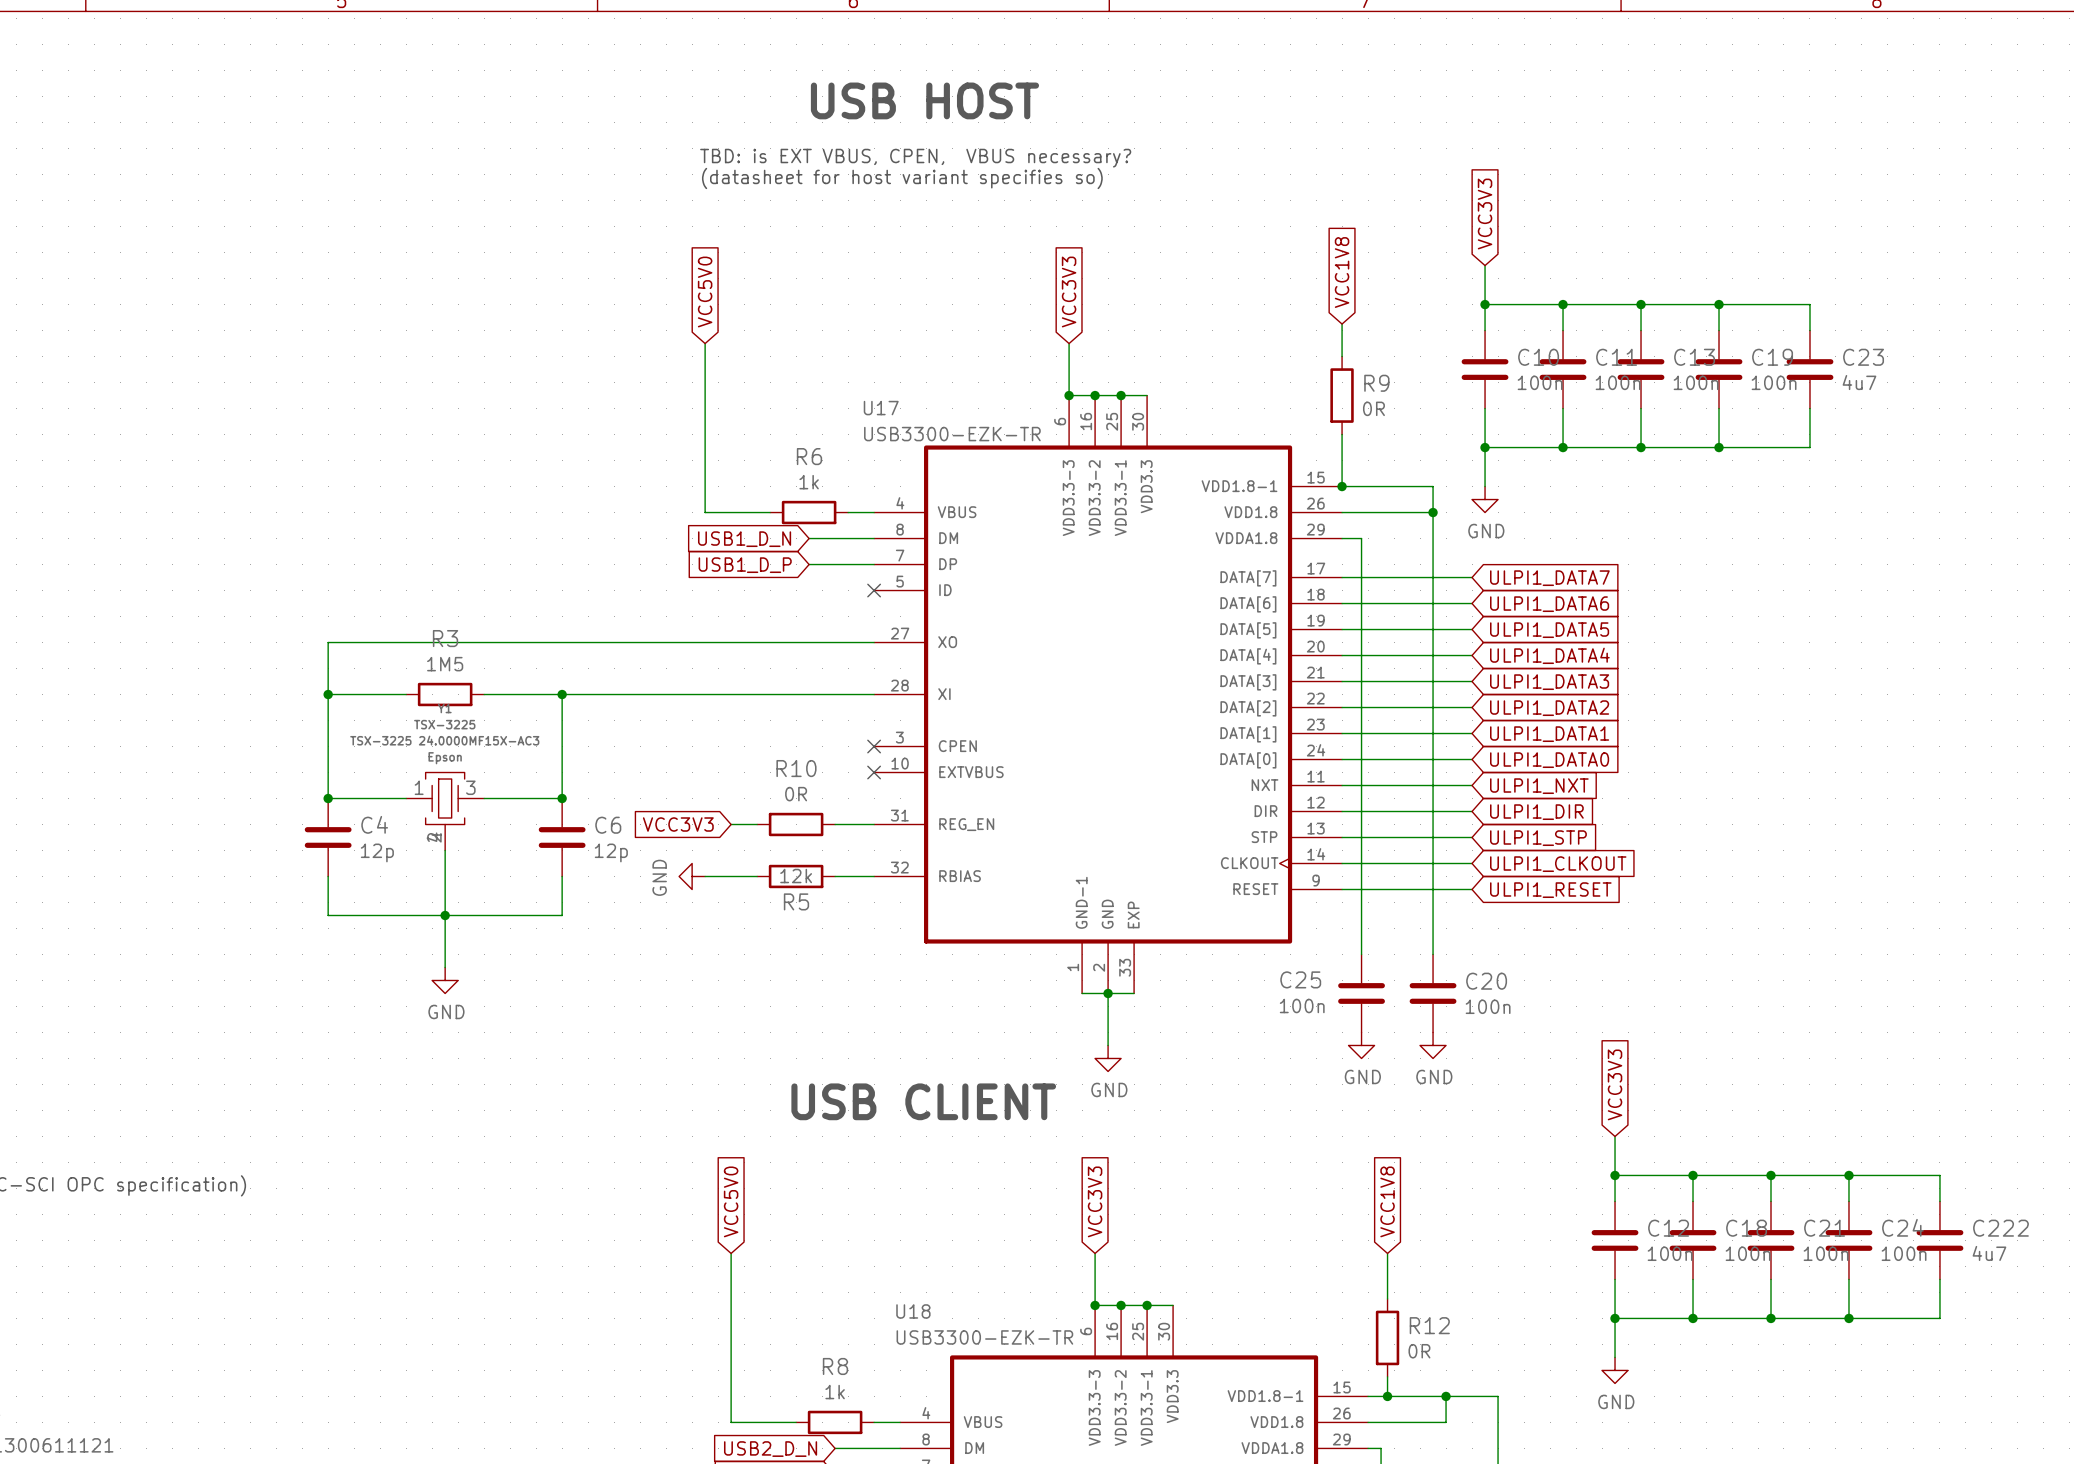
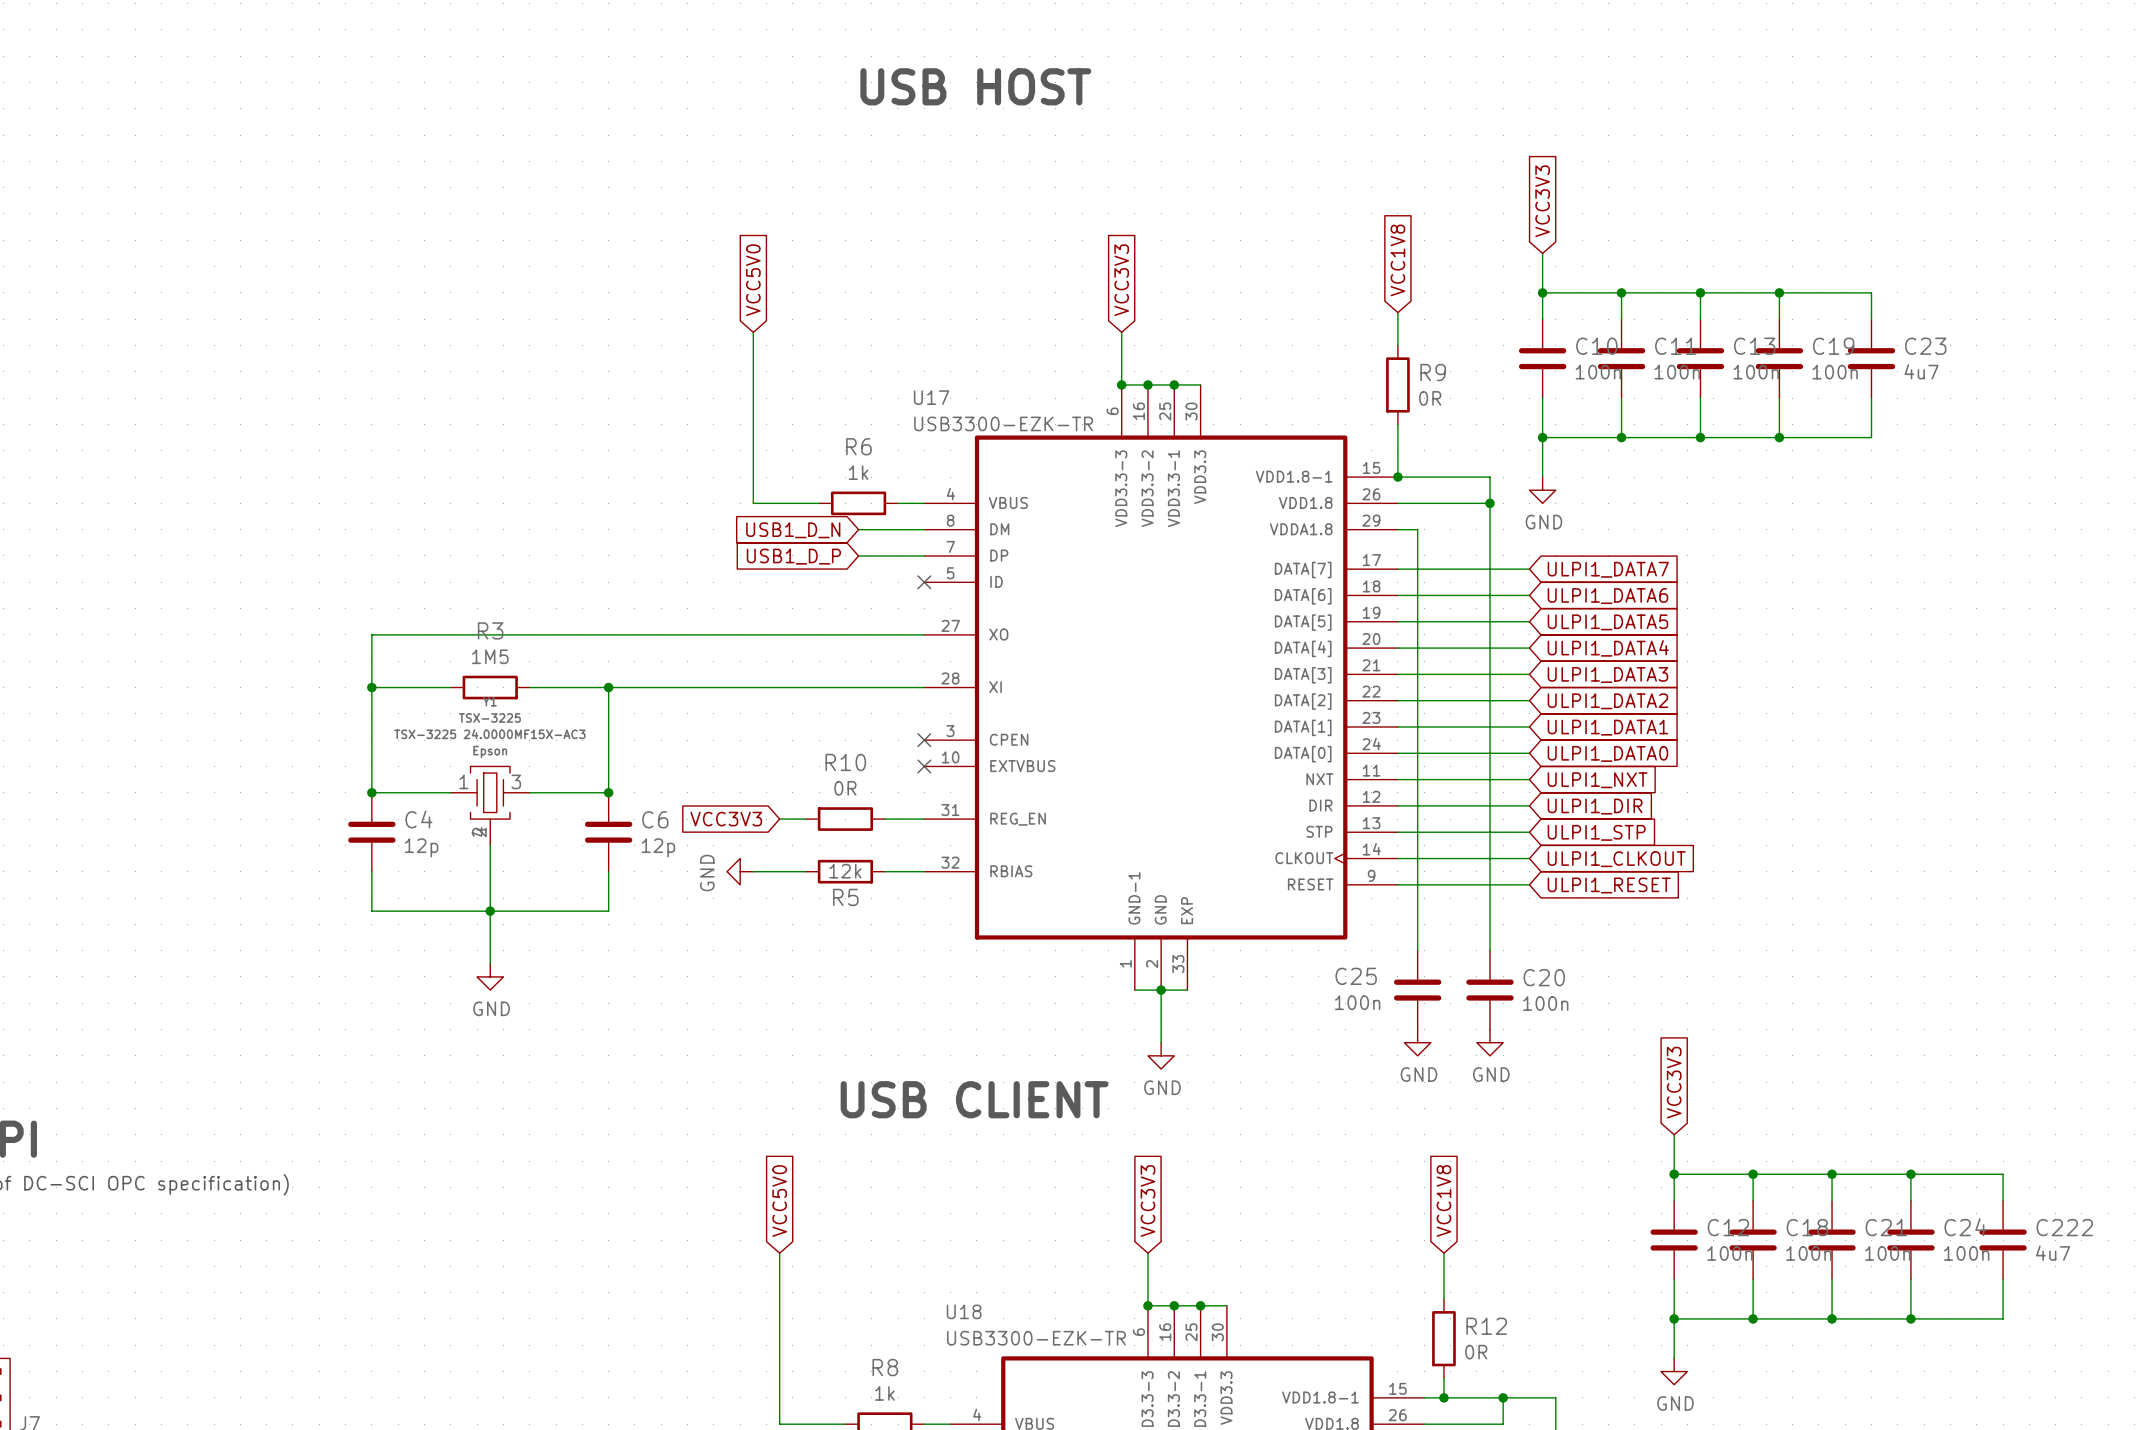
text: TBD: is EXT VBUS, CPEN, VBUS necessary? (915, 158) -> none
text: (datasheet for host variant specifies so) (902, 178) -> none

